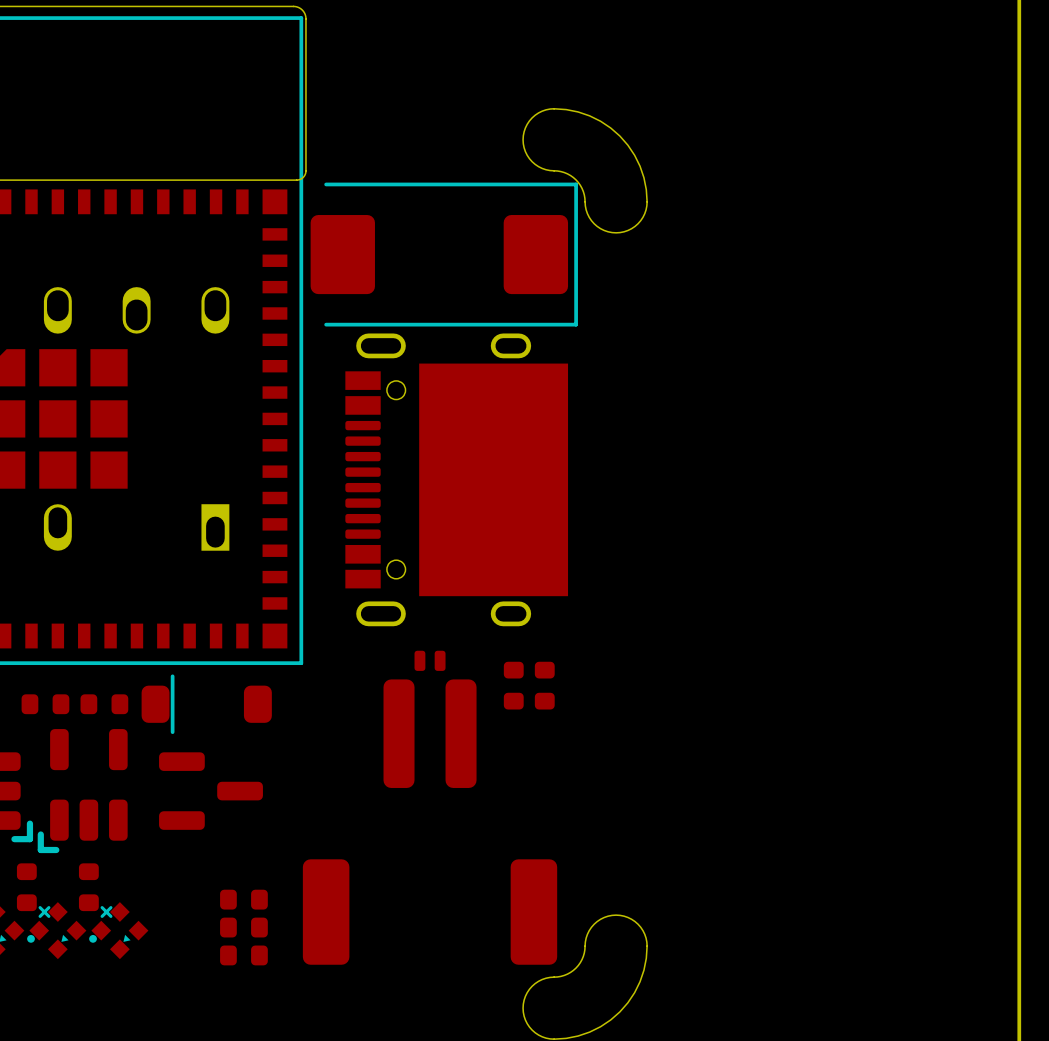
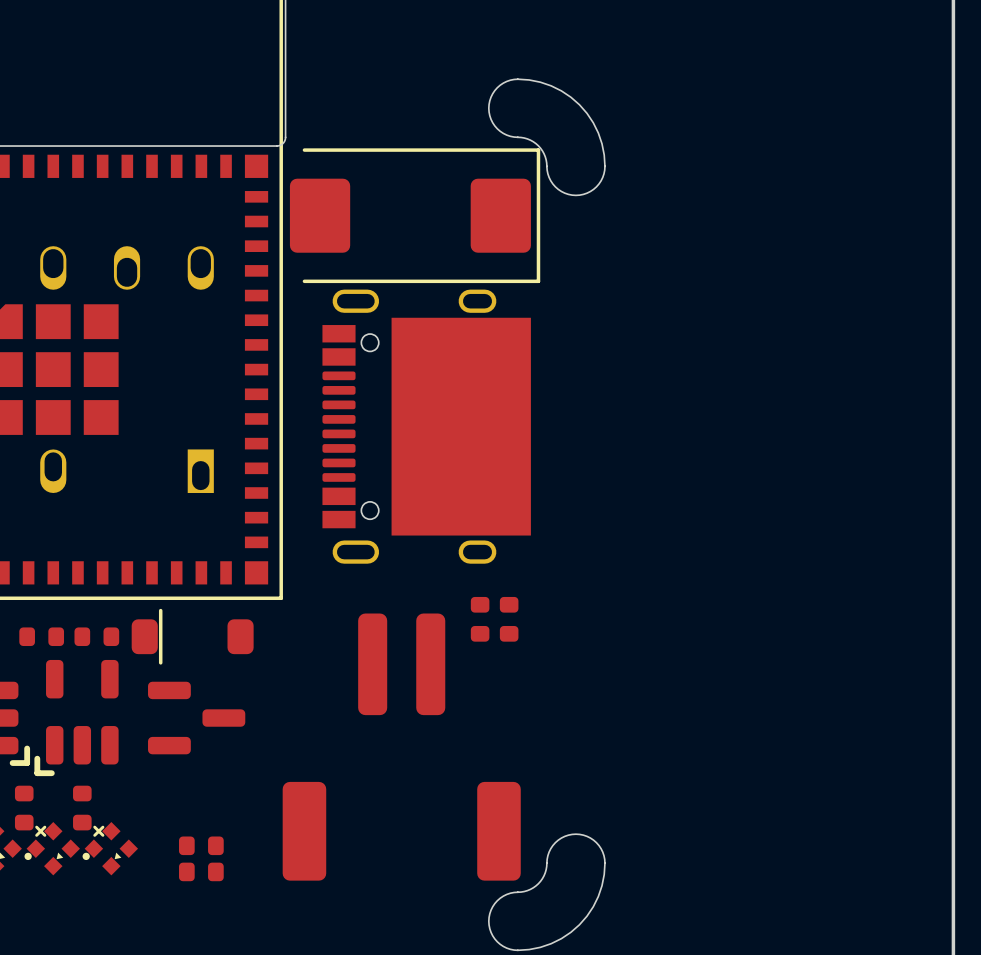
part: (430, 660) -> none
part: (243, 899) -> none
part: none -> (201, 845)
part: (243, 927) -> none
part: none -> (201, 871)
part: (243, 955) -> none

